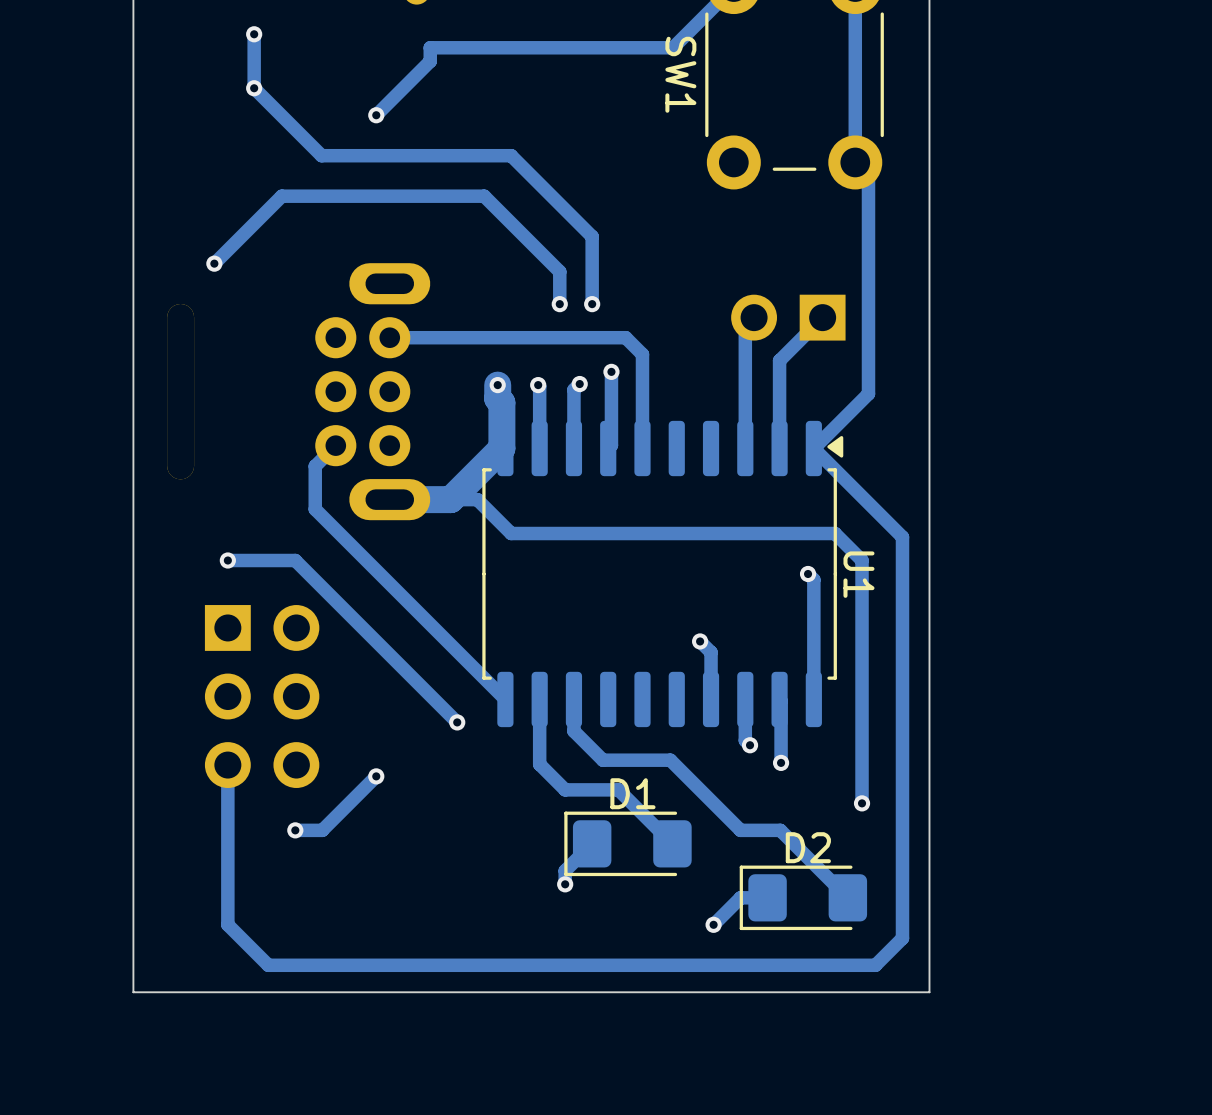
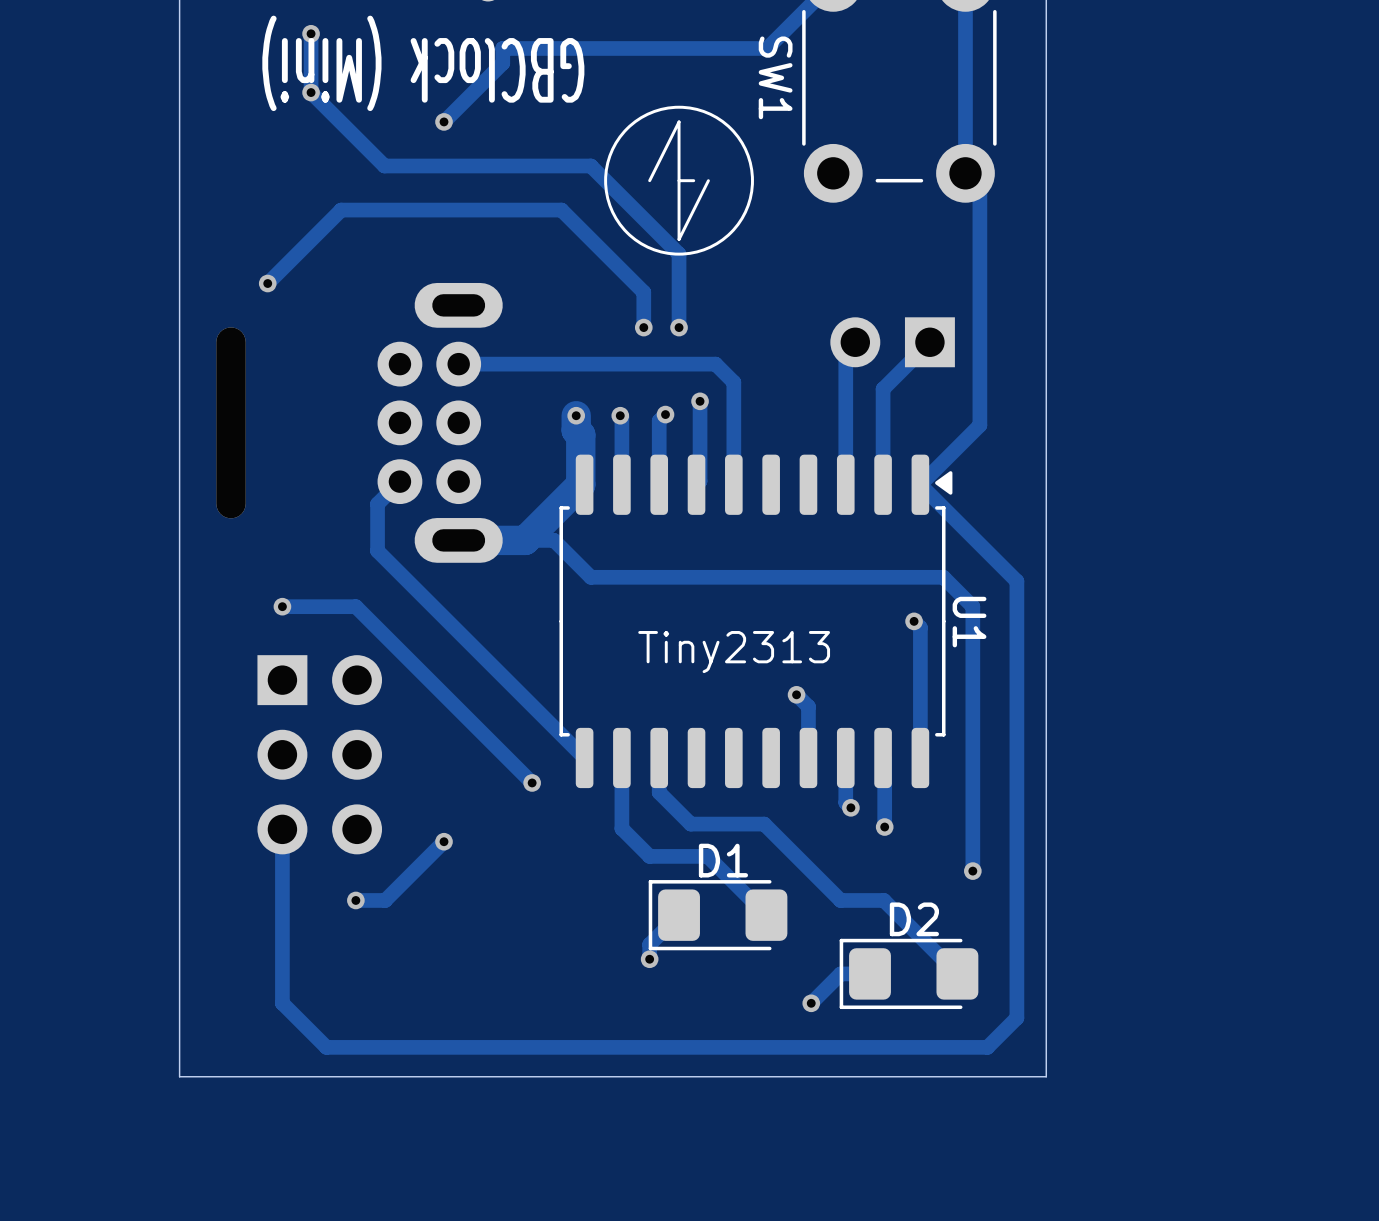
text: none -> GBClock (Mini) (423, 63)
drawing: none -> [604, 105, 754, 256]
line: none -> (693, 180) (679, 180)
line: none -> (708, 180) (679, 239) (679, 121) (649, 180)
text: none -> Tiny2313 (734, 652)

